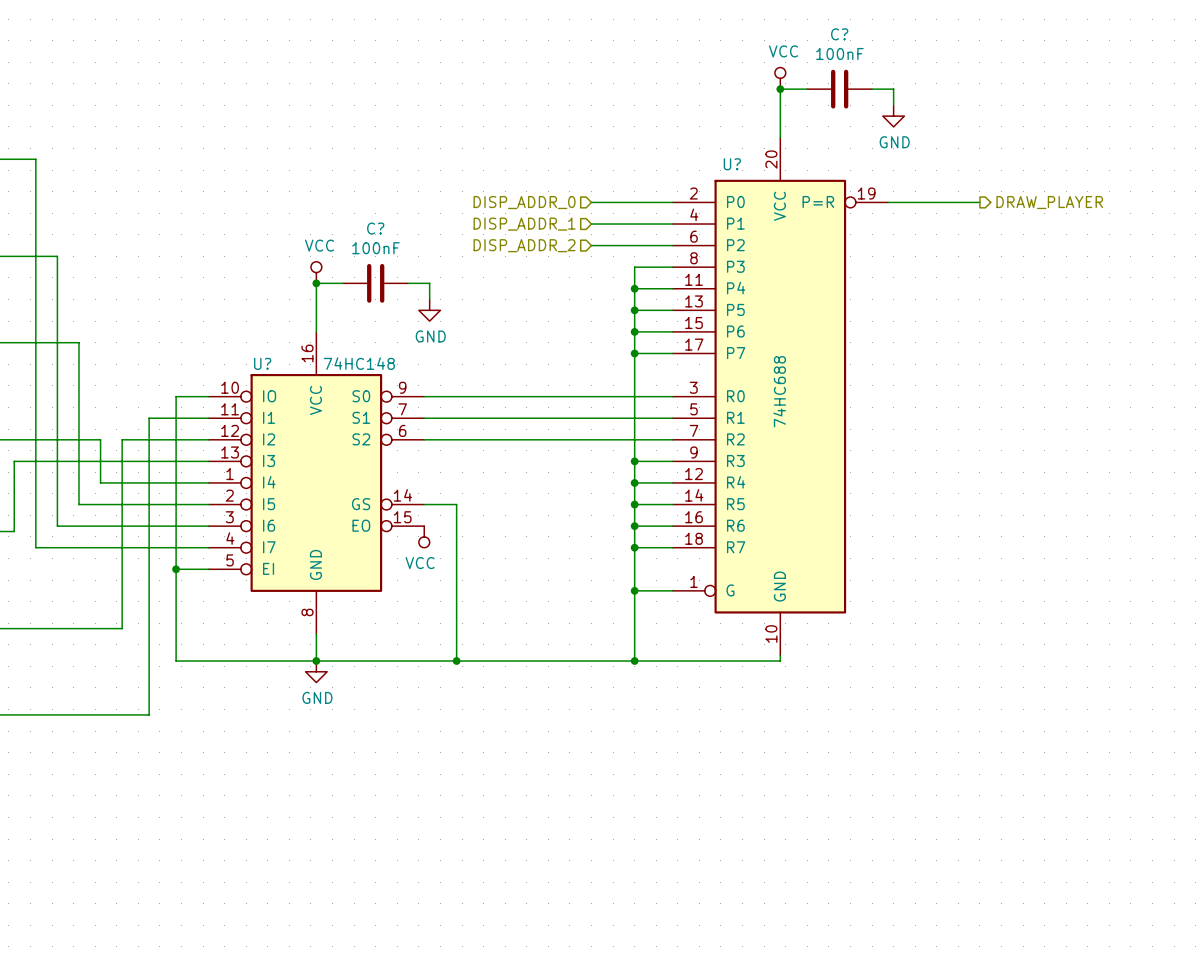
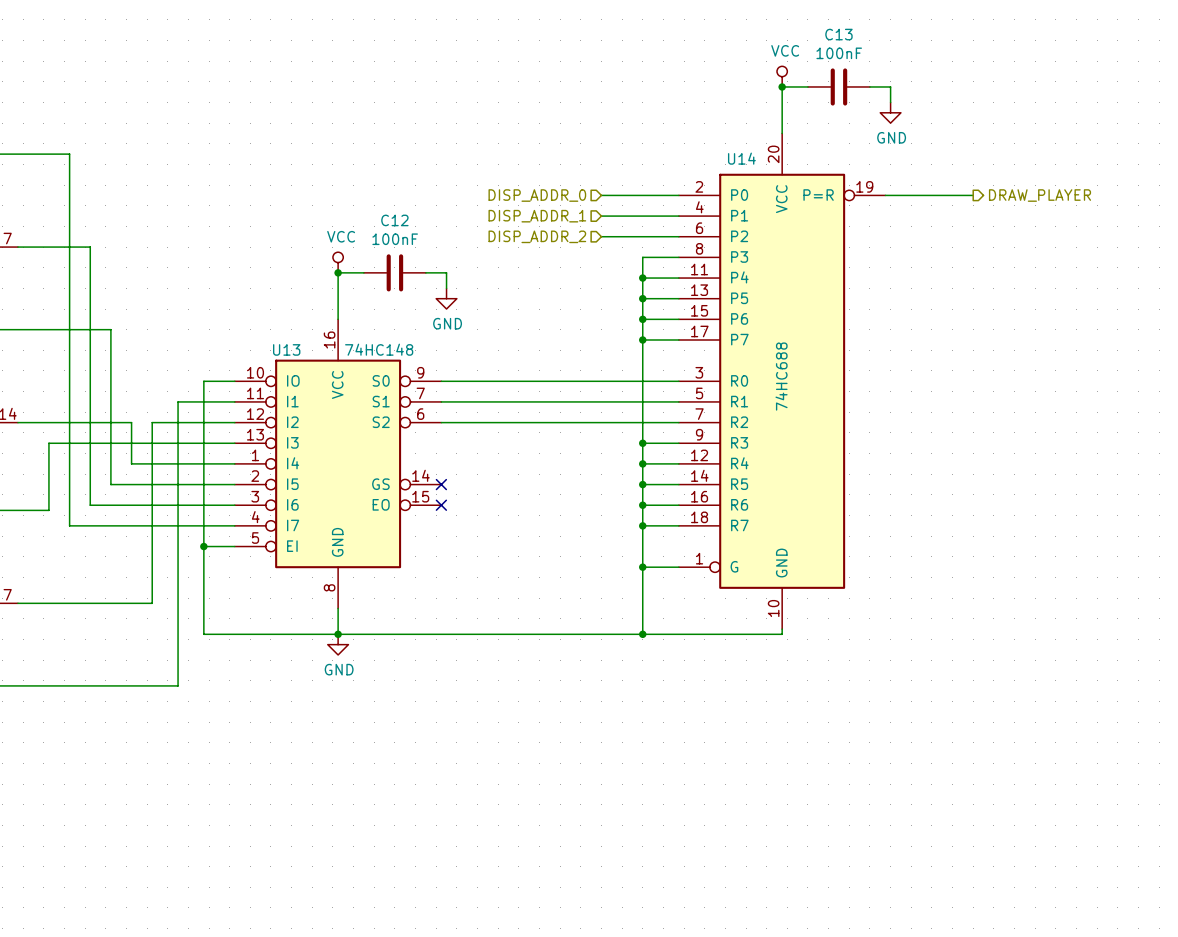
C? name: C? (839, 34) -> C13 (838, 34)
U? name: U? (732, 164) -> U14 (741, 158)
C? name: C? (375, 228) -> C12 (394, 220)
U? name: U? (262, 363) -> U13 (286, 349)
wire: (424, 504) (456, 504) (456, 661) -> none
no-connect mark: none -> (441, 484)
no-connect mark: none -> (441, 505)
power symbol: VCC (424, 536) -> none
junction: (456, 661) -> none

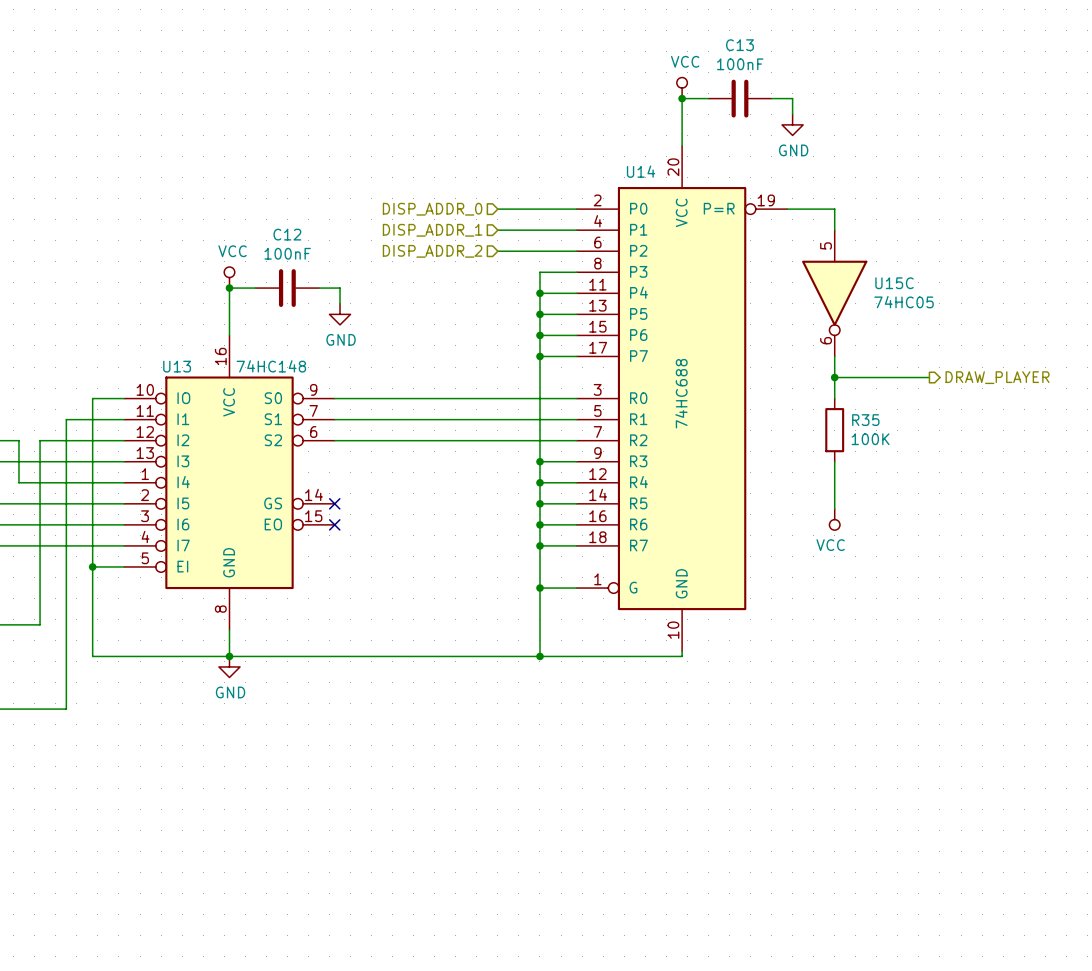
wire: (931, 195) (973, 195) -> (834, 209) (834, 230)
hierarchical label position: DRAW_PLAYER (1040, 195) -> DRAW_PLAYER (997, 377)
U15C: none -> 74HC05 (834, 293)
wire: none -> (834, 356) (834, 398)
wire: none -> (834, 377) (929, 377)
junction: none -> (834, 377)
R35: none -> 100K (834, 430)
wire: none -> (834, 461) (834, 509)
power symbol: none -> VCC (834, 519)

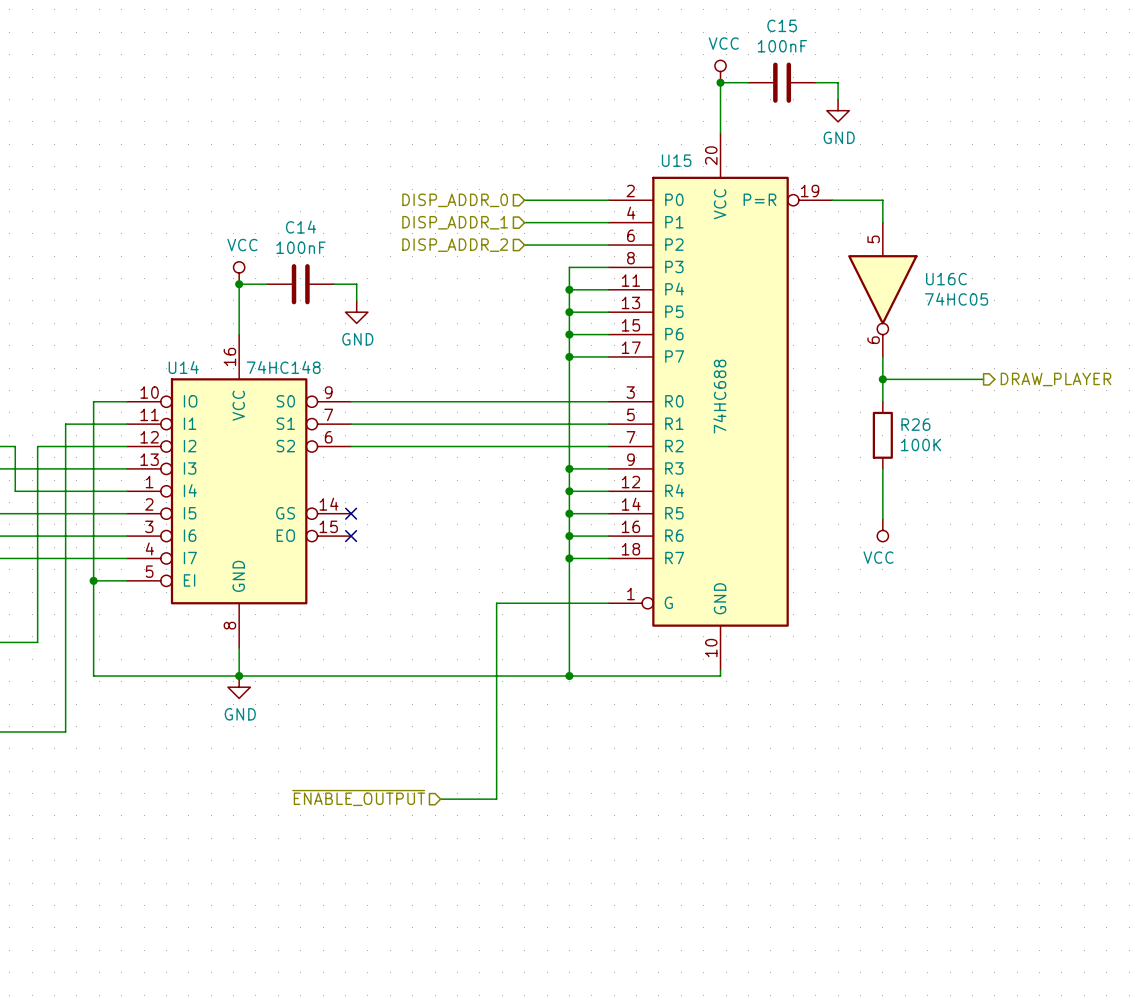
C13 name: C13 (739, 45) -> C15 (782, 25)
U14 name: U14 (641, 171) -> U15 (676, 160)
C12 name: C12 (287, 234) -> C14 (300, 227)
U15C name: U15C (894, 283) -> U16C (946, 279)
U13 name: U13 (177, 366) -> U14 (183, 367)
R35 name: R35 (865, 420) -> R26 (915, 424)
wire: none -> (569, 603) (496, 603) (496, 799) (440, 799)
junction: (539, 588) -> none
hierarchical label: none -> ~{ENABLE_OUTPUT} (358, 797)

